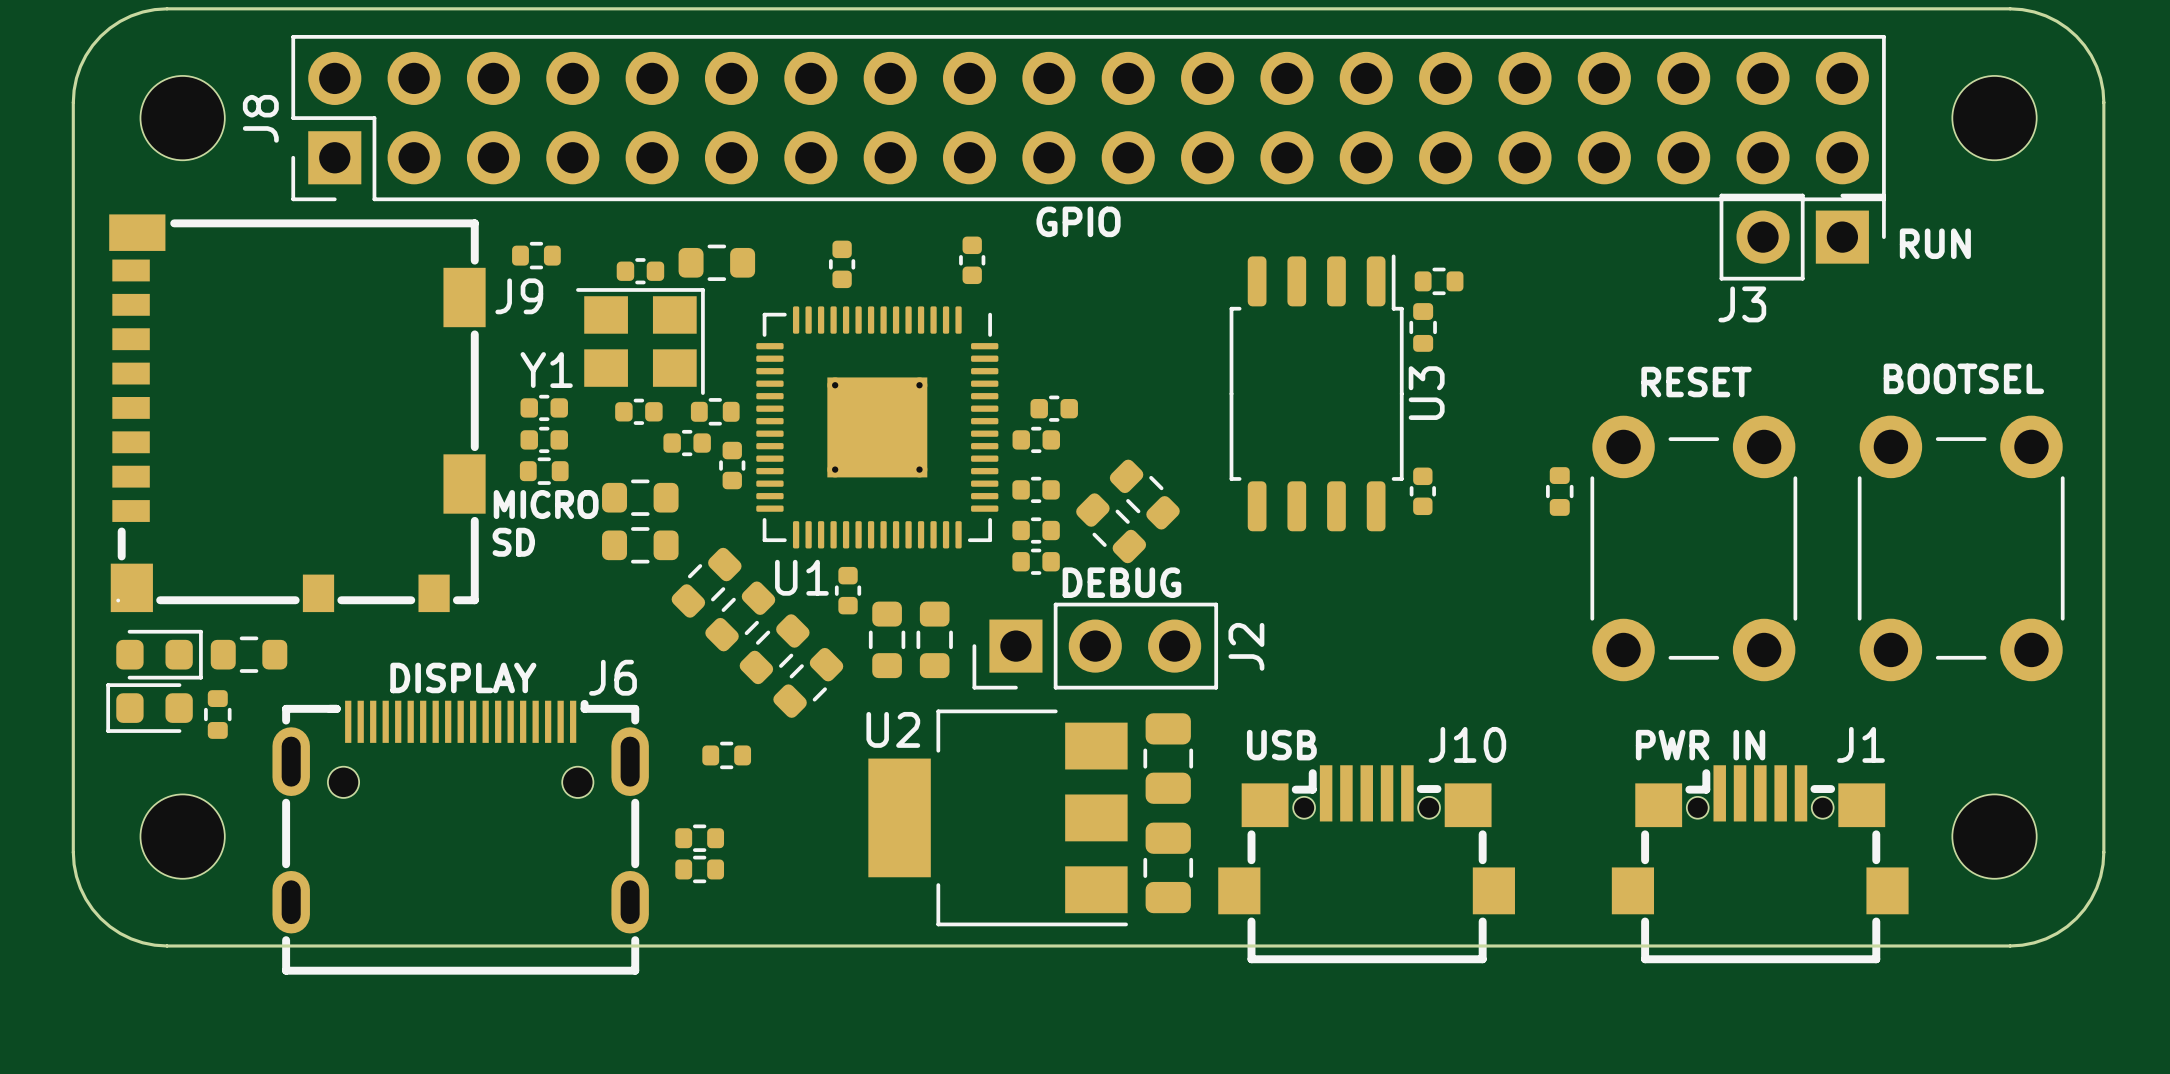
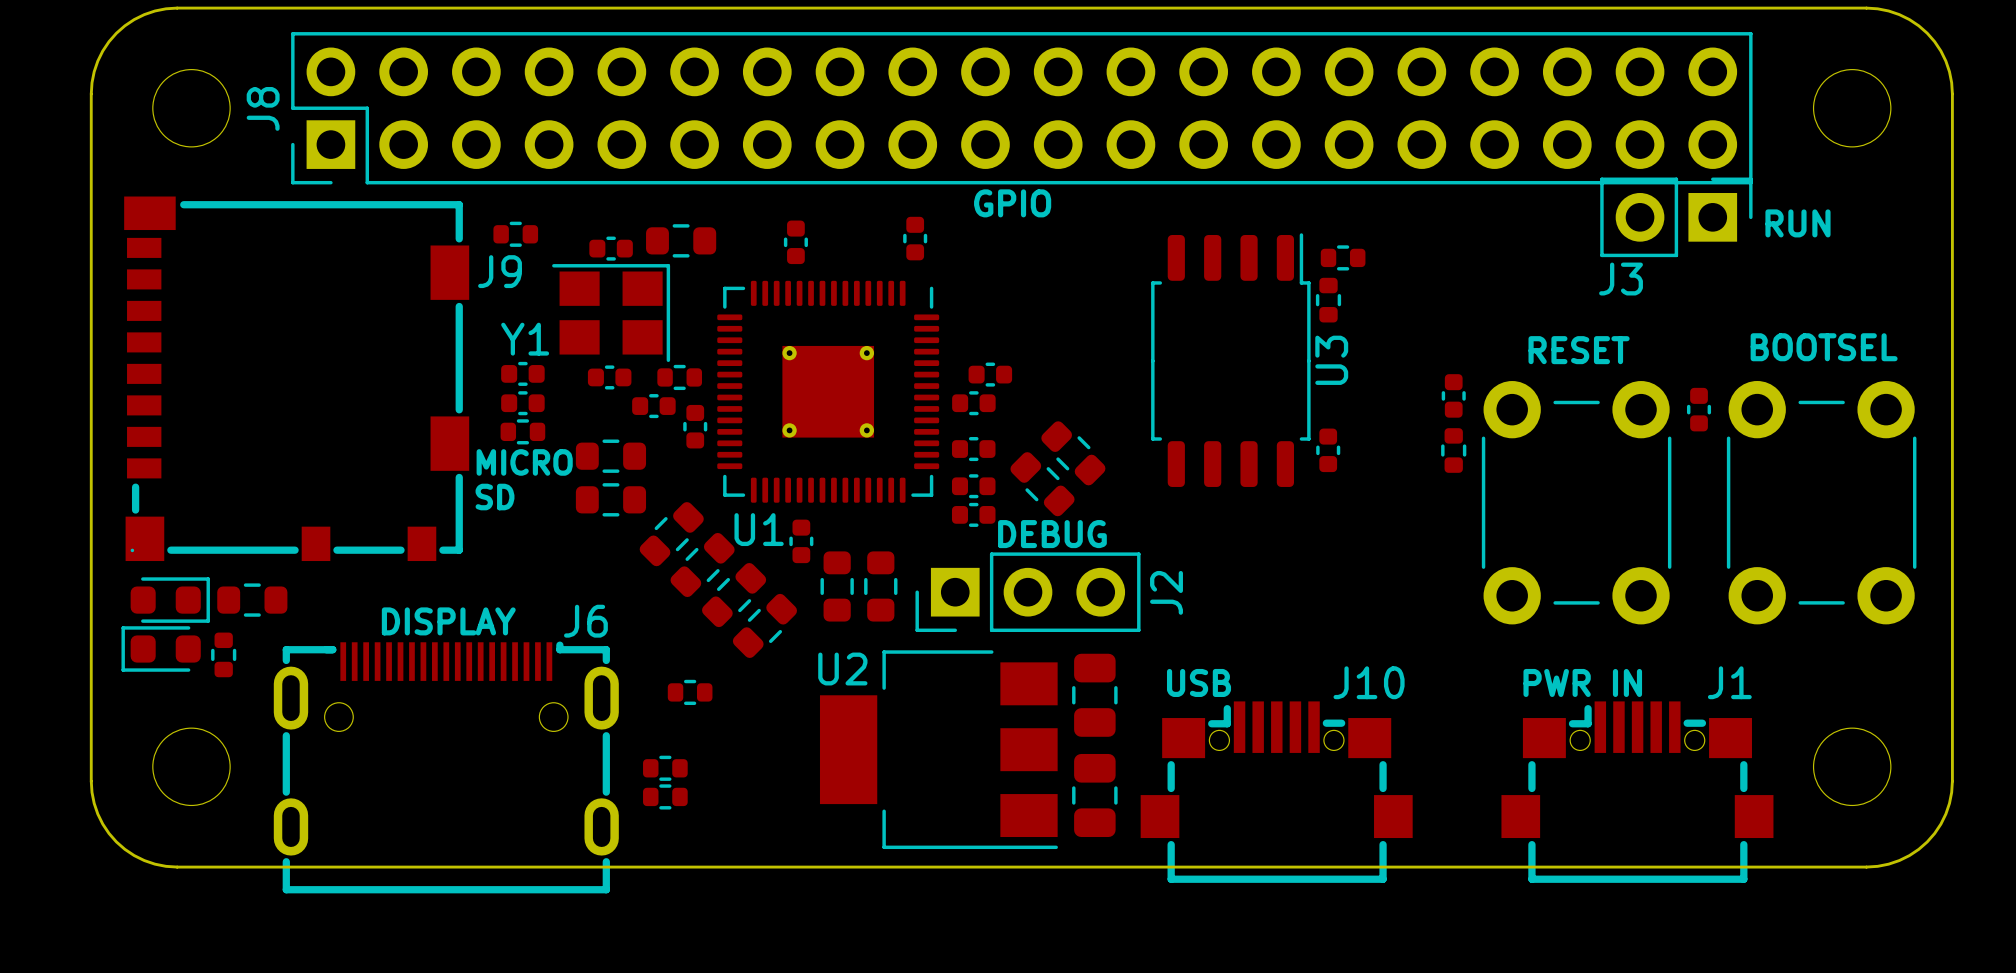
part: none -> (1453, 395)
part: none -> (1699, 409)

